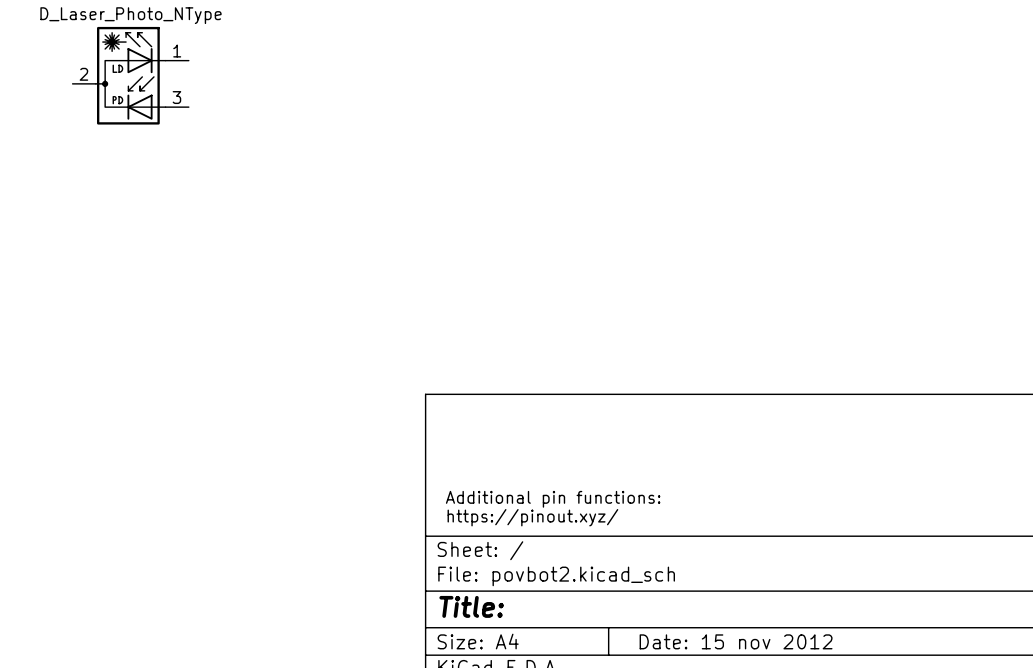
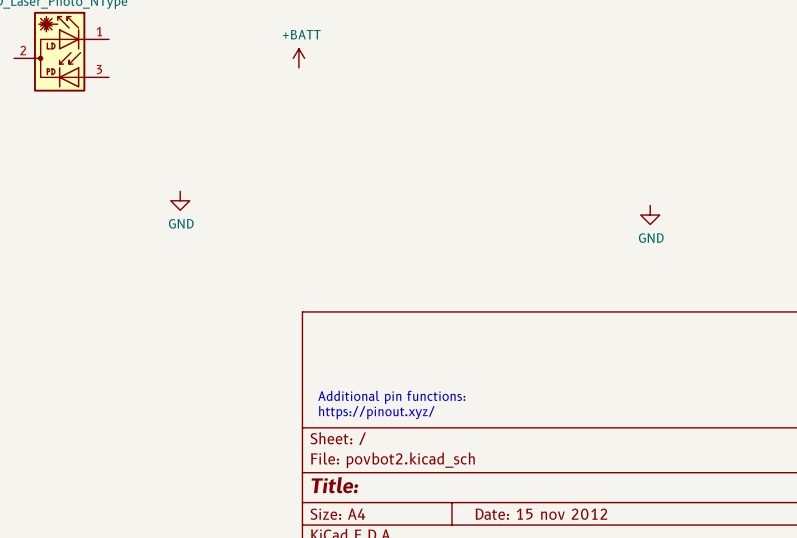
power symbol: none -> +BATT (298, 58)
power symbol: none -> GND (180, 200)
power symbol: none -> GND (650, 215)

